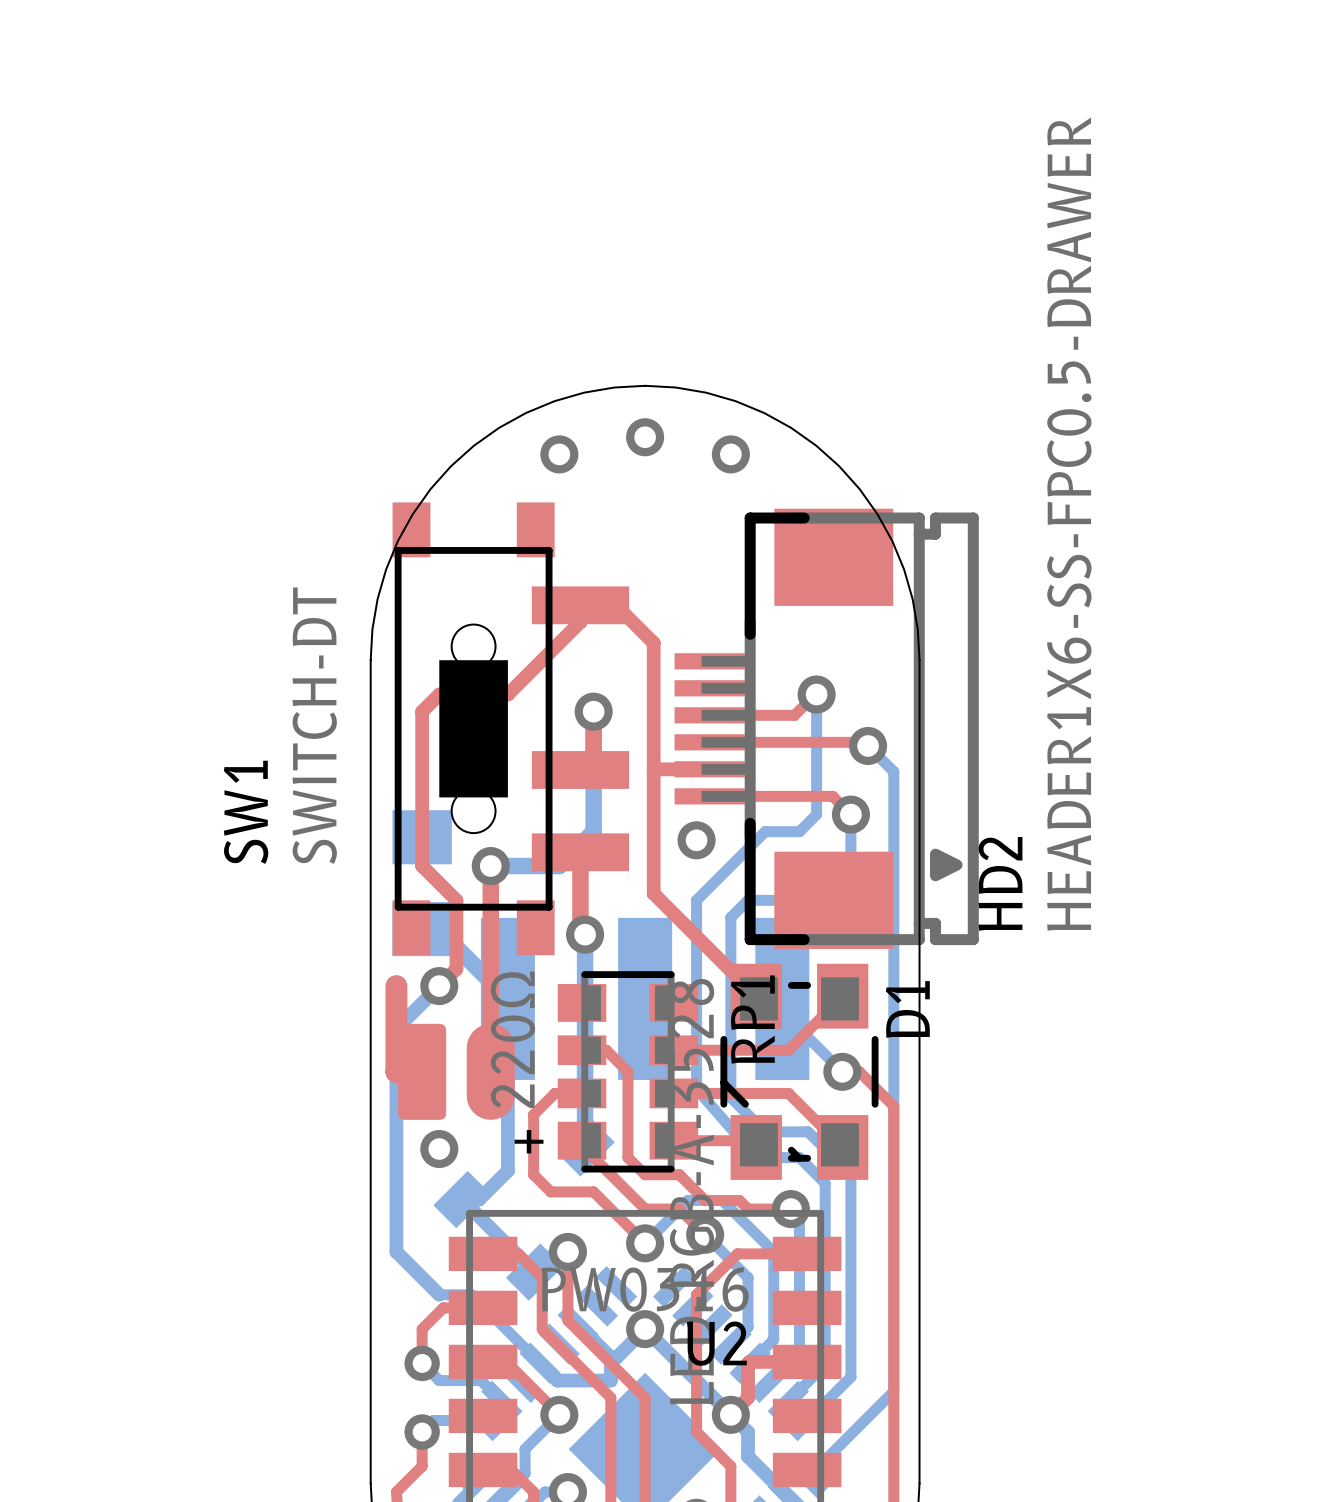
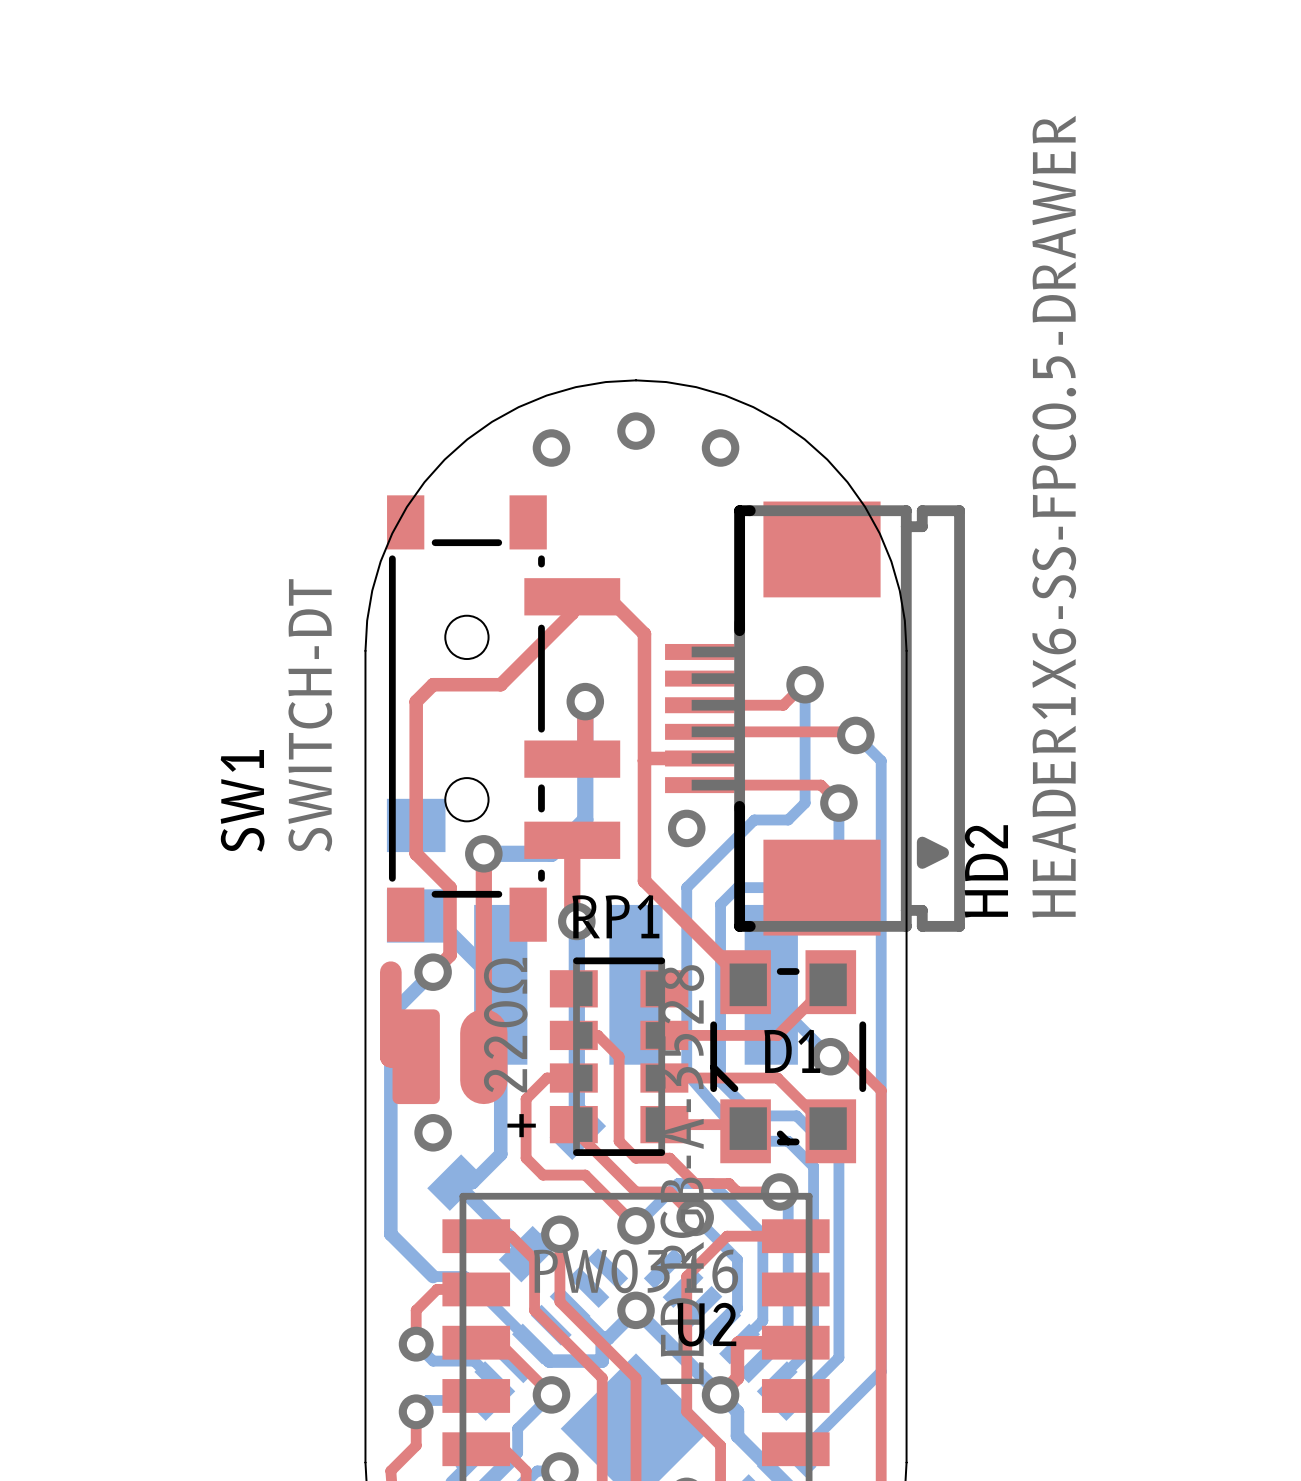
SW1 footprint: [392, 502, 630, 956] -> [387, 495, 621, 942]
HD2 footprint: [674, 508, 979, 949] -> [665, 501, 965, 936]
D1 name rotation: 0° (907, 1009) -> 90° clockwise (792, 1051)
D1 name position: D1 (907, 1009) -> D1 (792, 1051)
RP1 name rotation: 0° (752, 1019) -> 90° clockwise (615, 916)
RP1 name position: RP1 (752, 1019) -> RP1 (615, 916)

